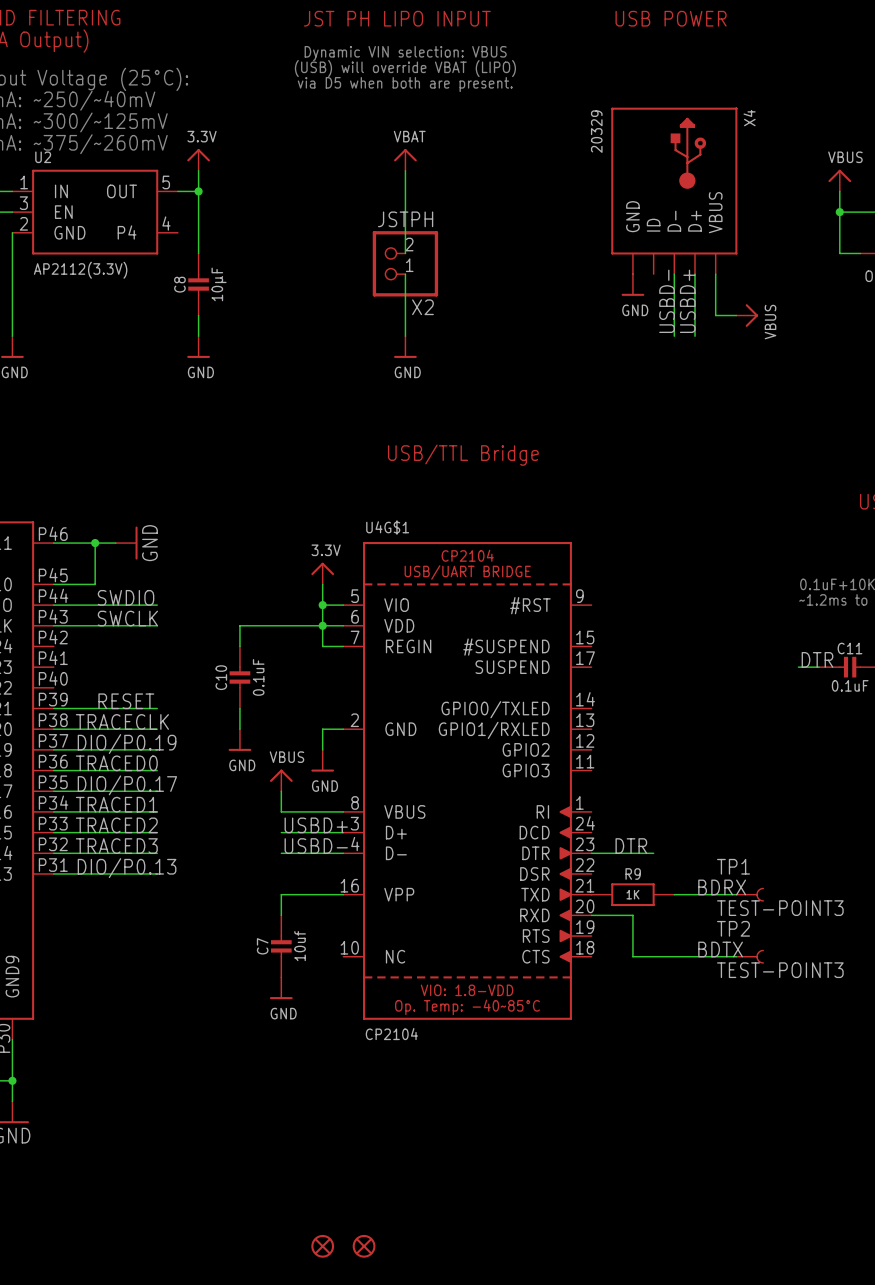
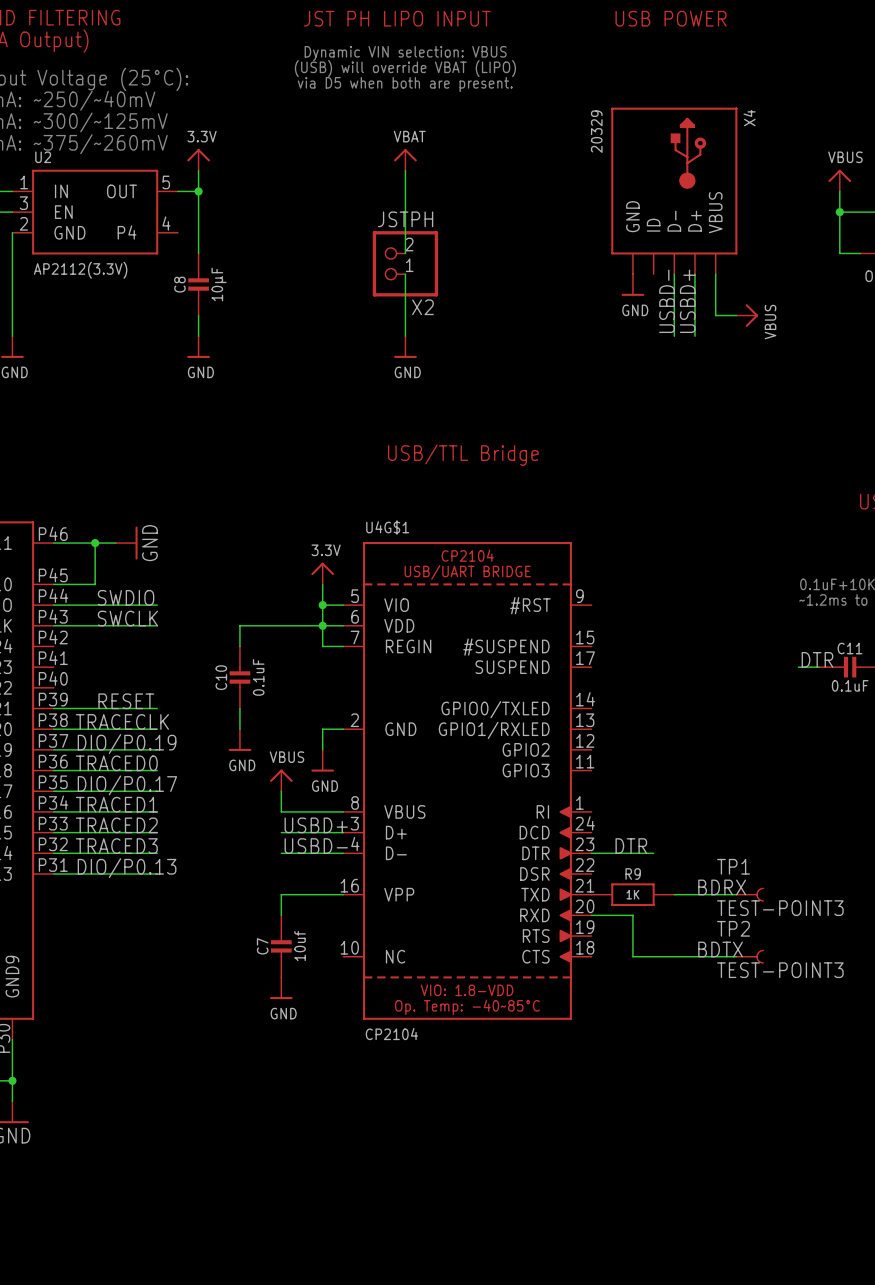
part: (322, 1246) -> none
part: (364, 1246) -> none

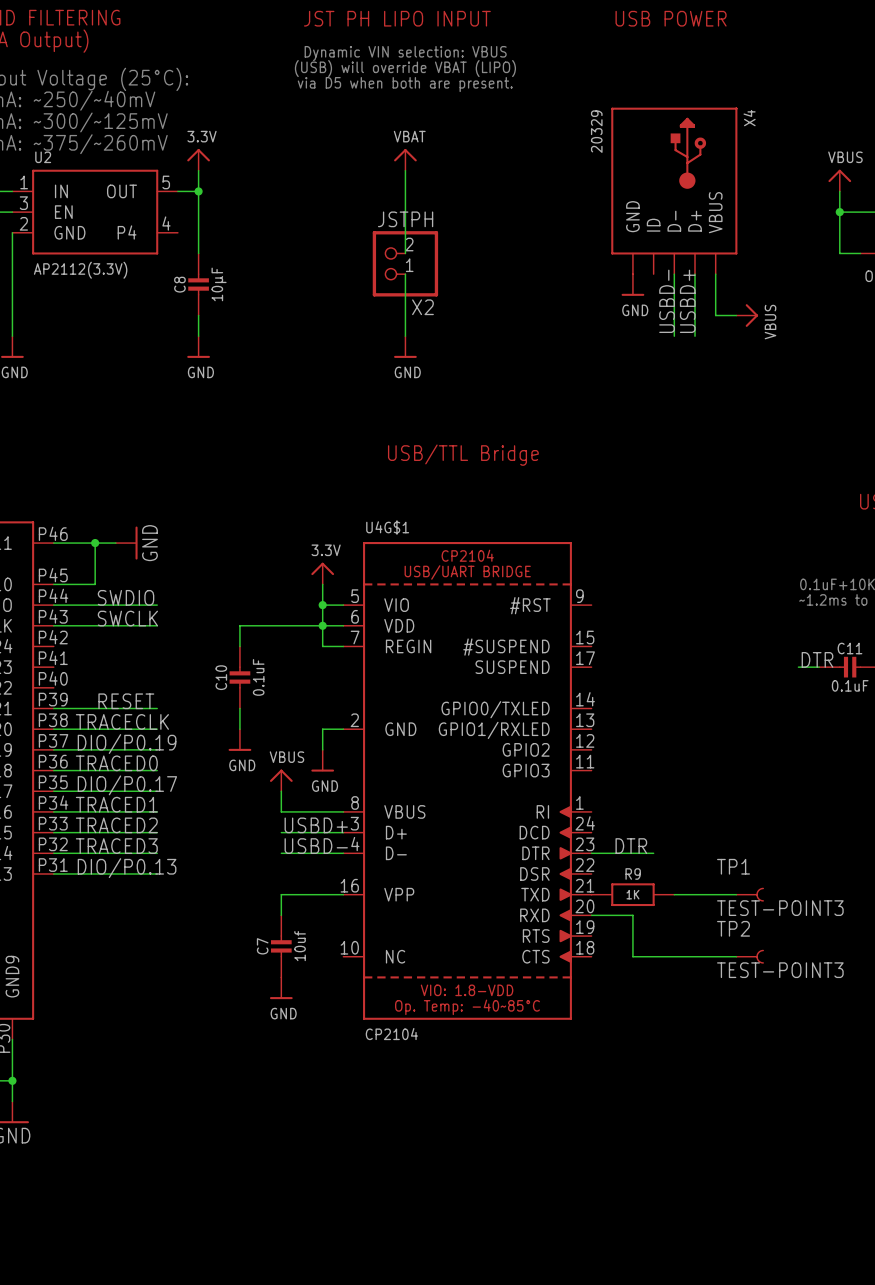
label: BDRX (722, 887) -> none
label: BDTX (720, 949) -> none

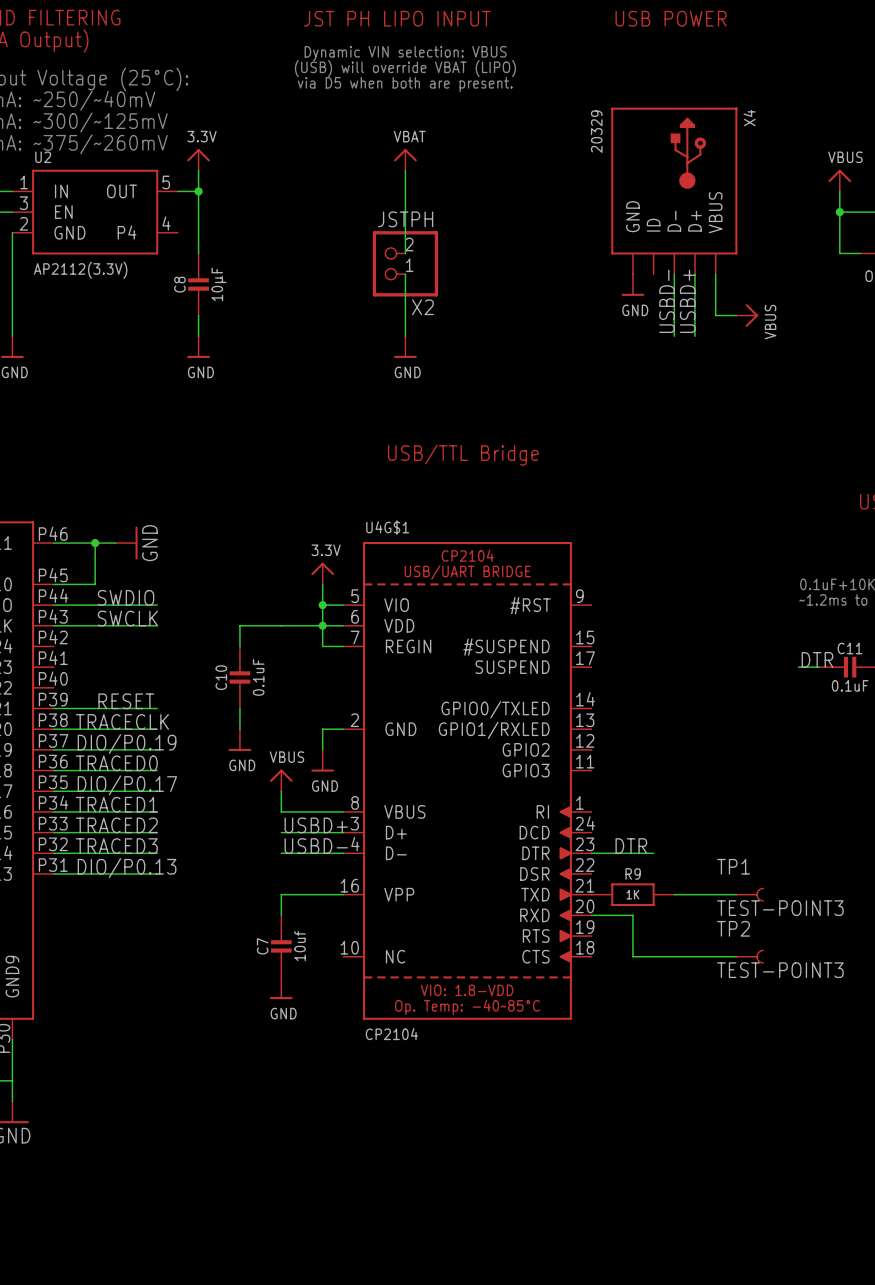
junction: (12, 1080) -> none

